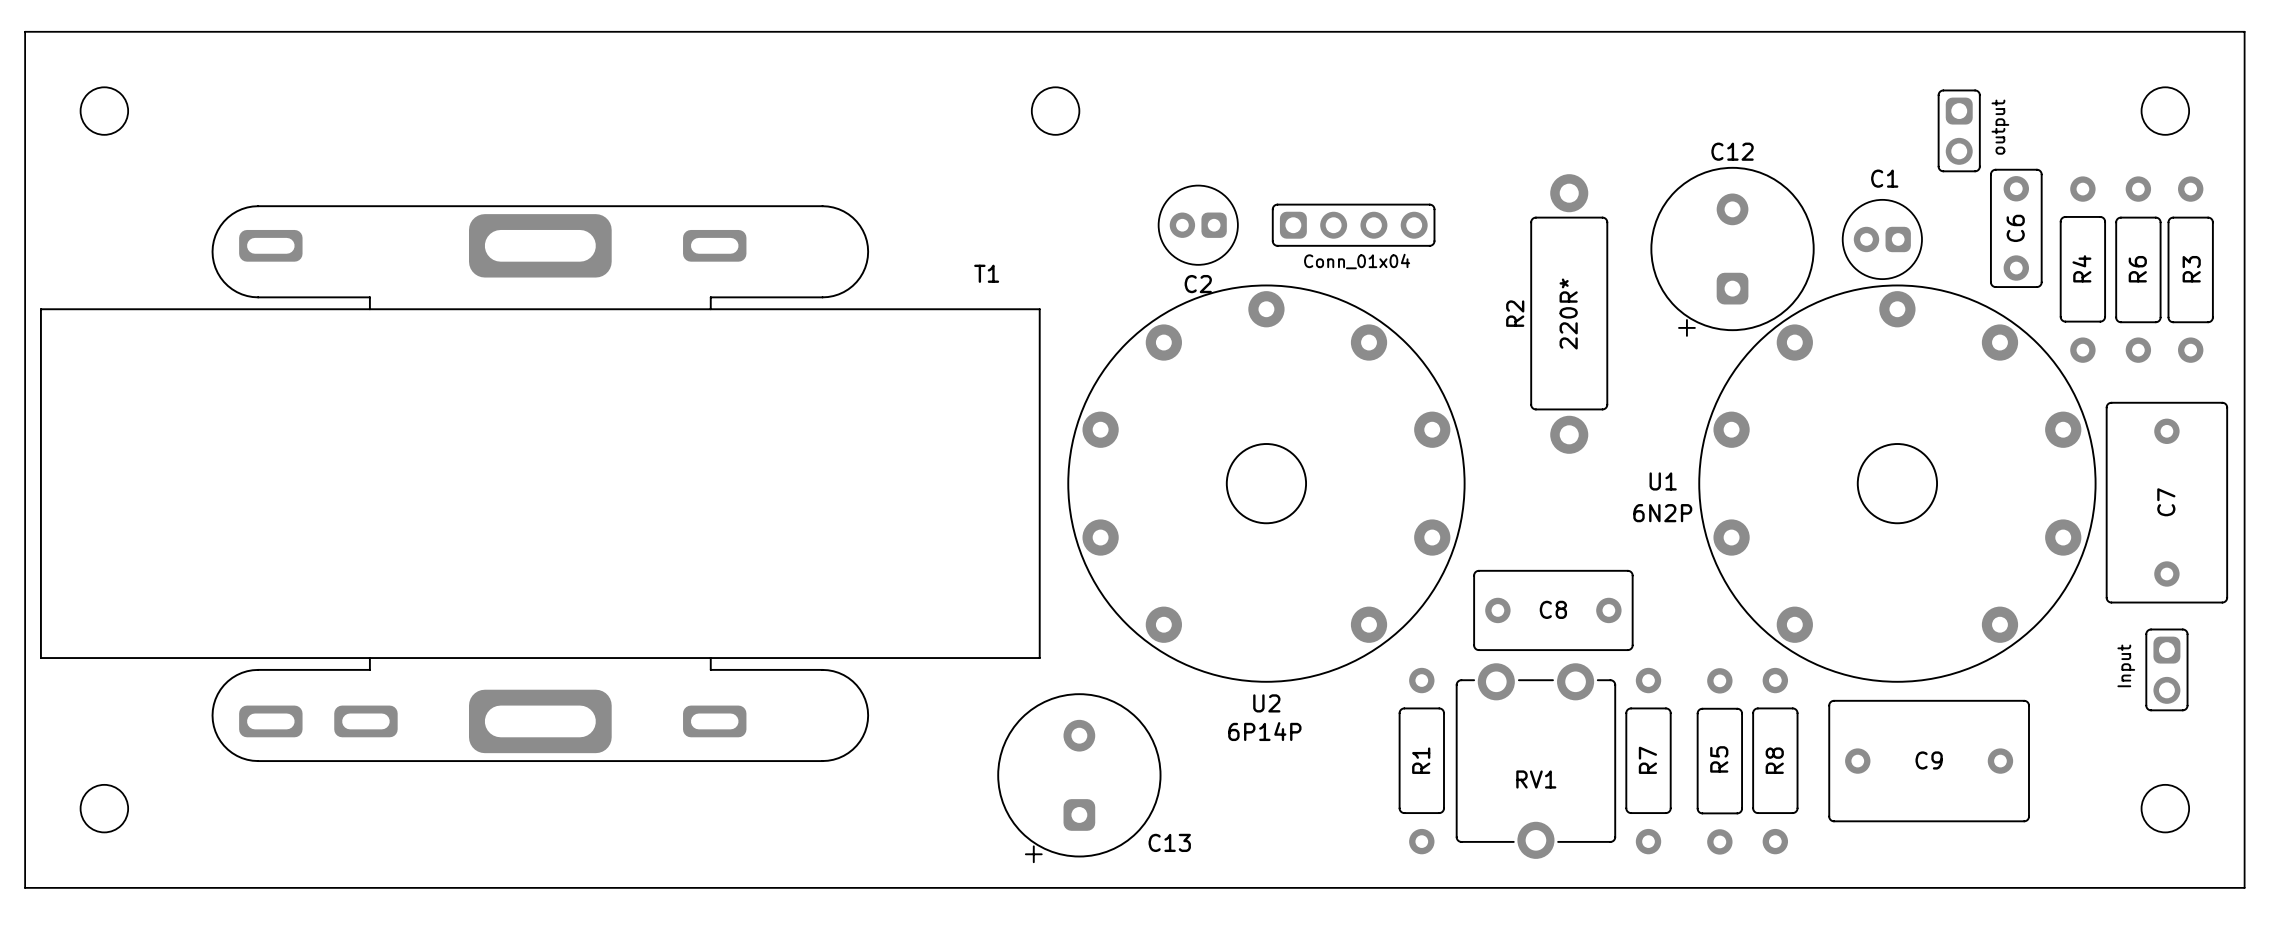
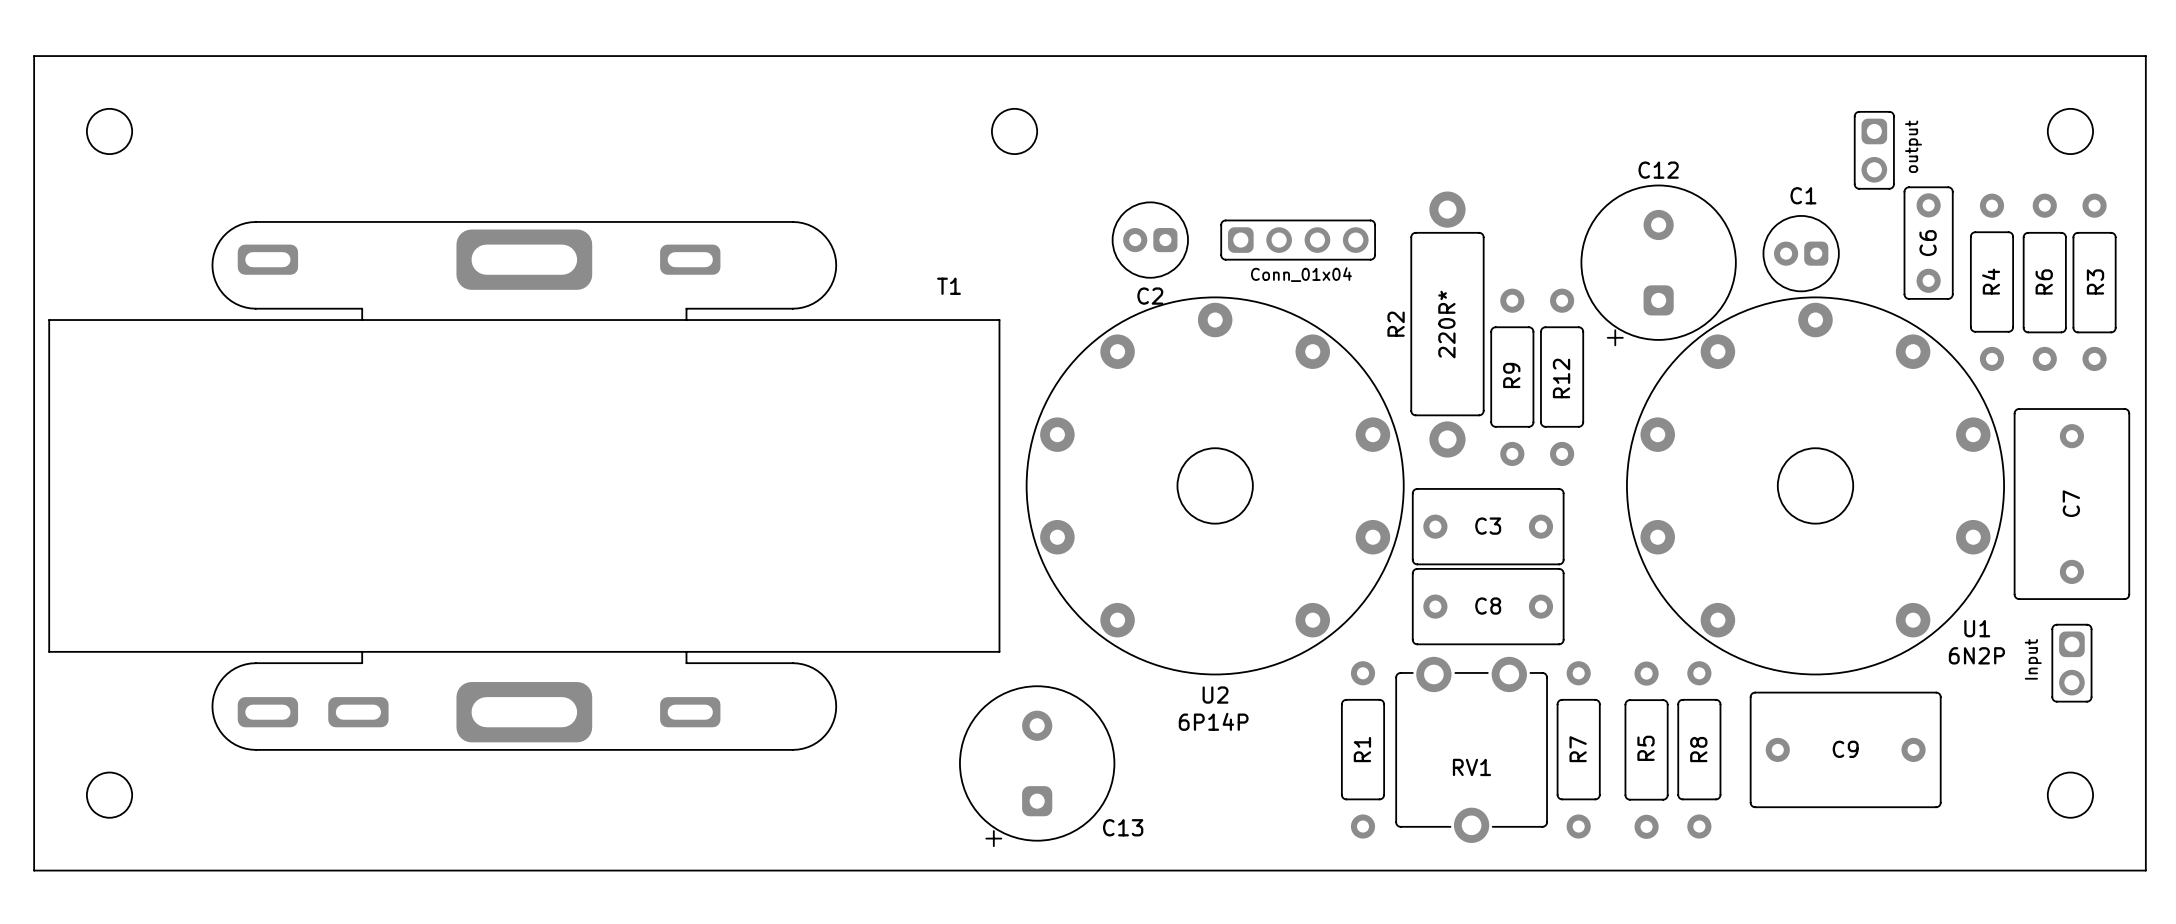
R2 position: (1569, 314) -> (1447, 324)
R9: none -> (1512, 377)
R12: none -> (1562, 377)
U1 name position: U1 (1663, 481) -> U1 (1977, 628)
U1 value position: 6N2P (1662, 513) -> 6N2P (1976, 655)
C3: none -> (1488, 526)

